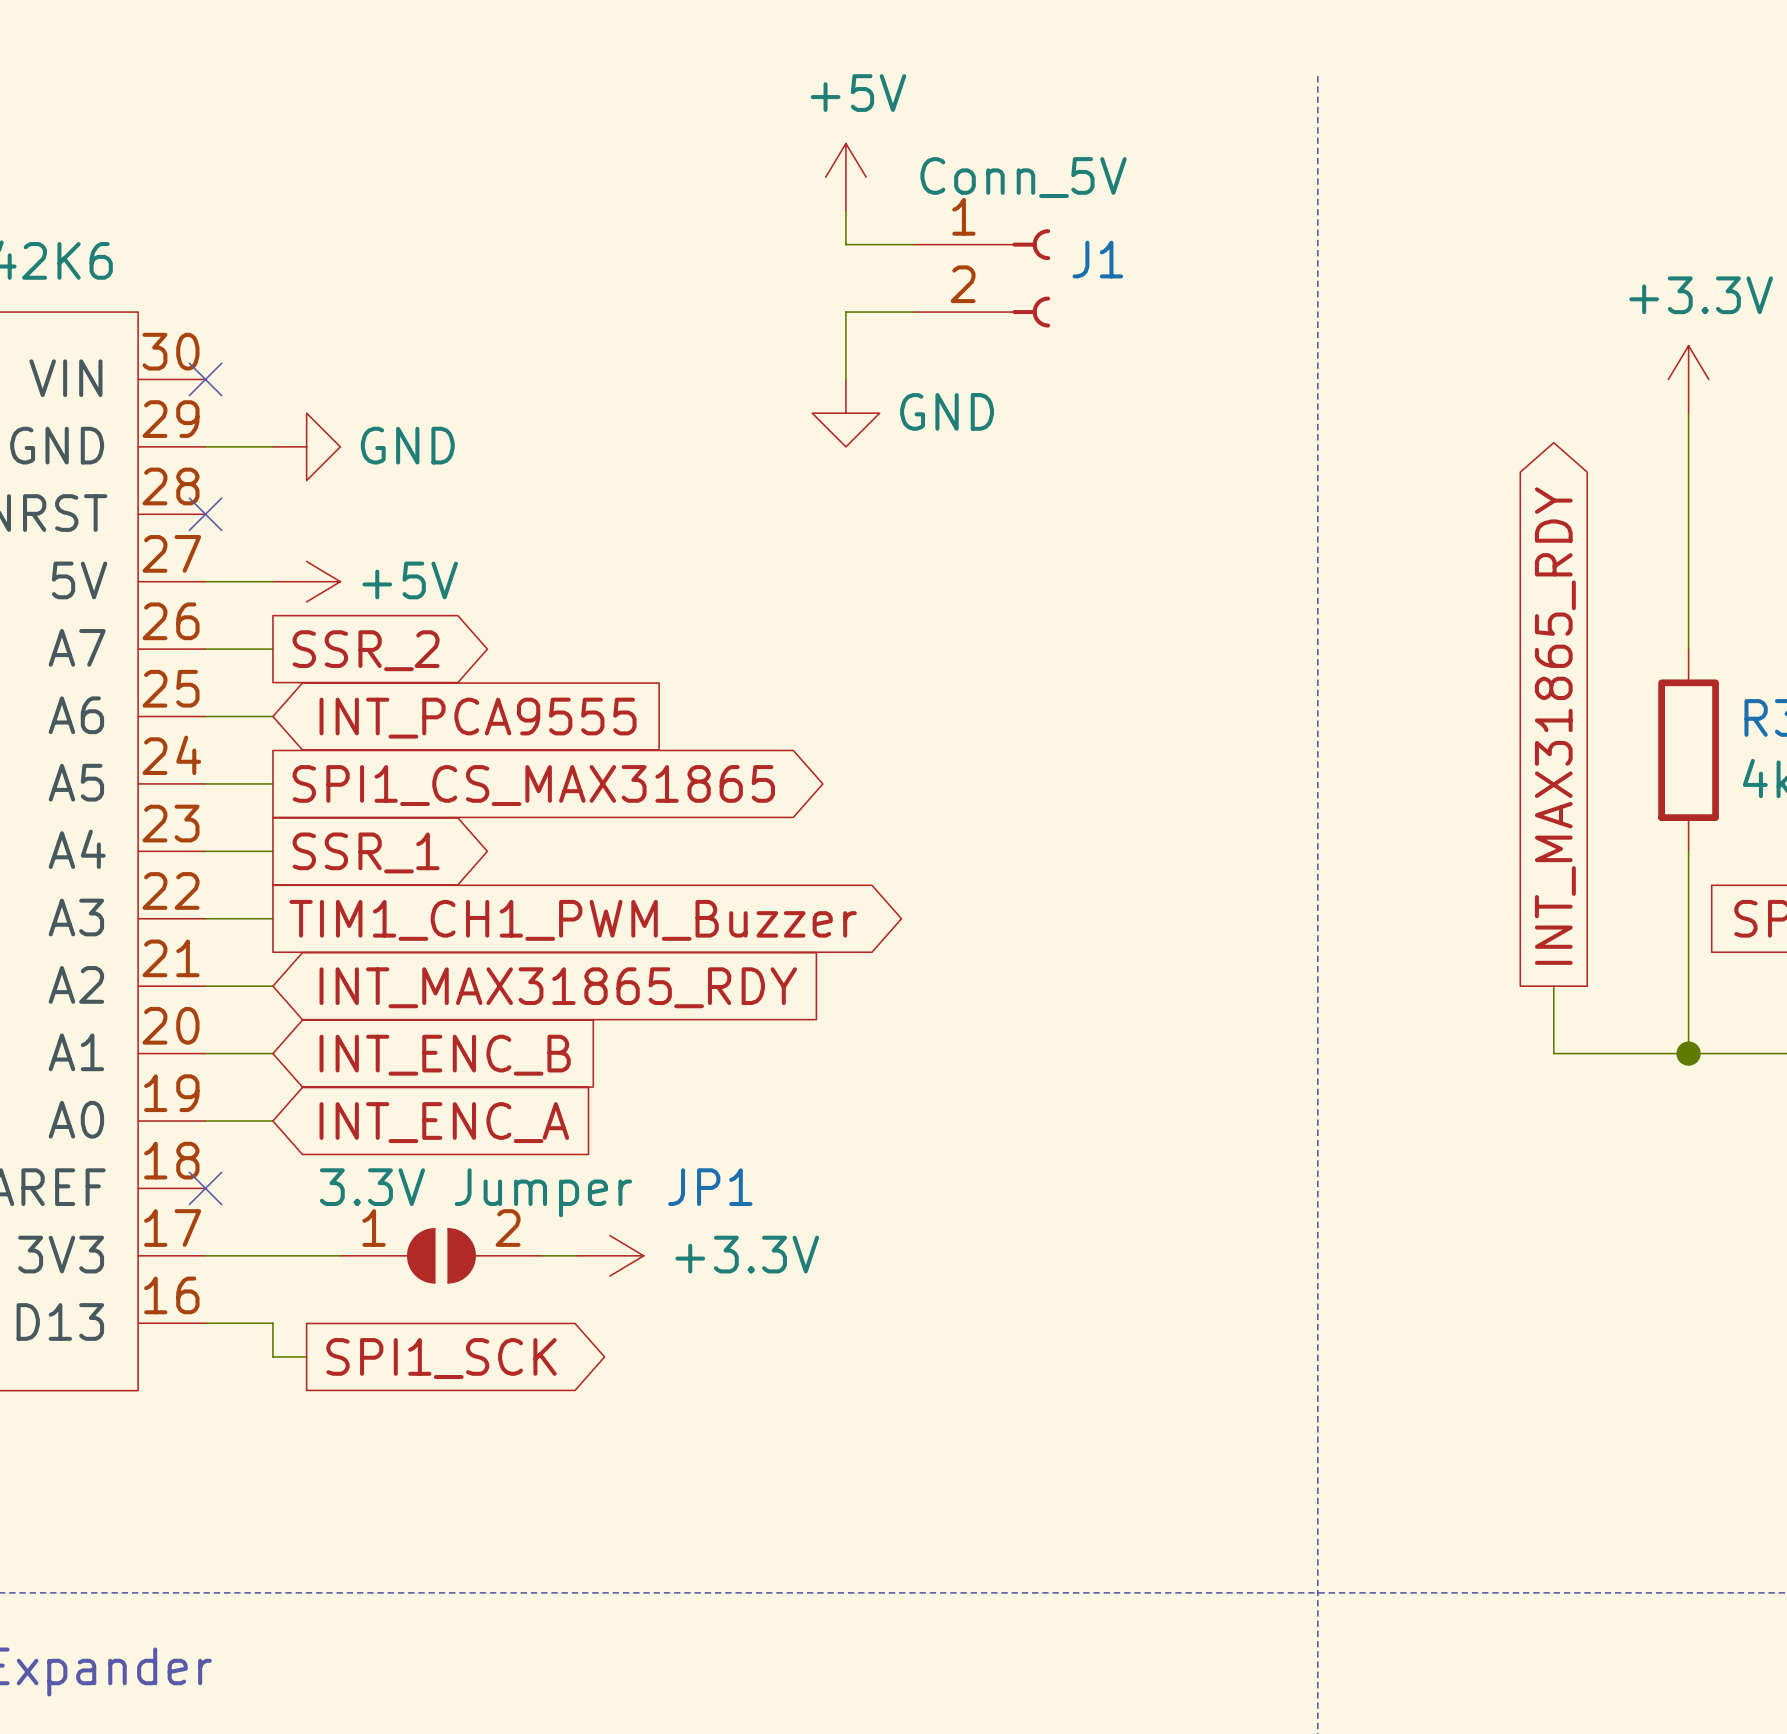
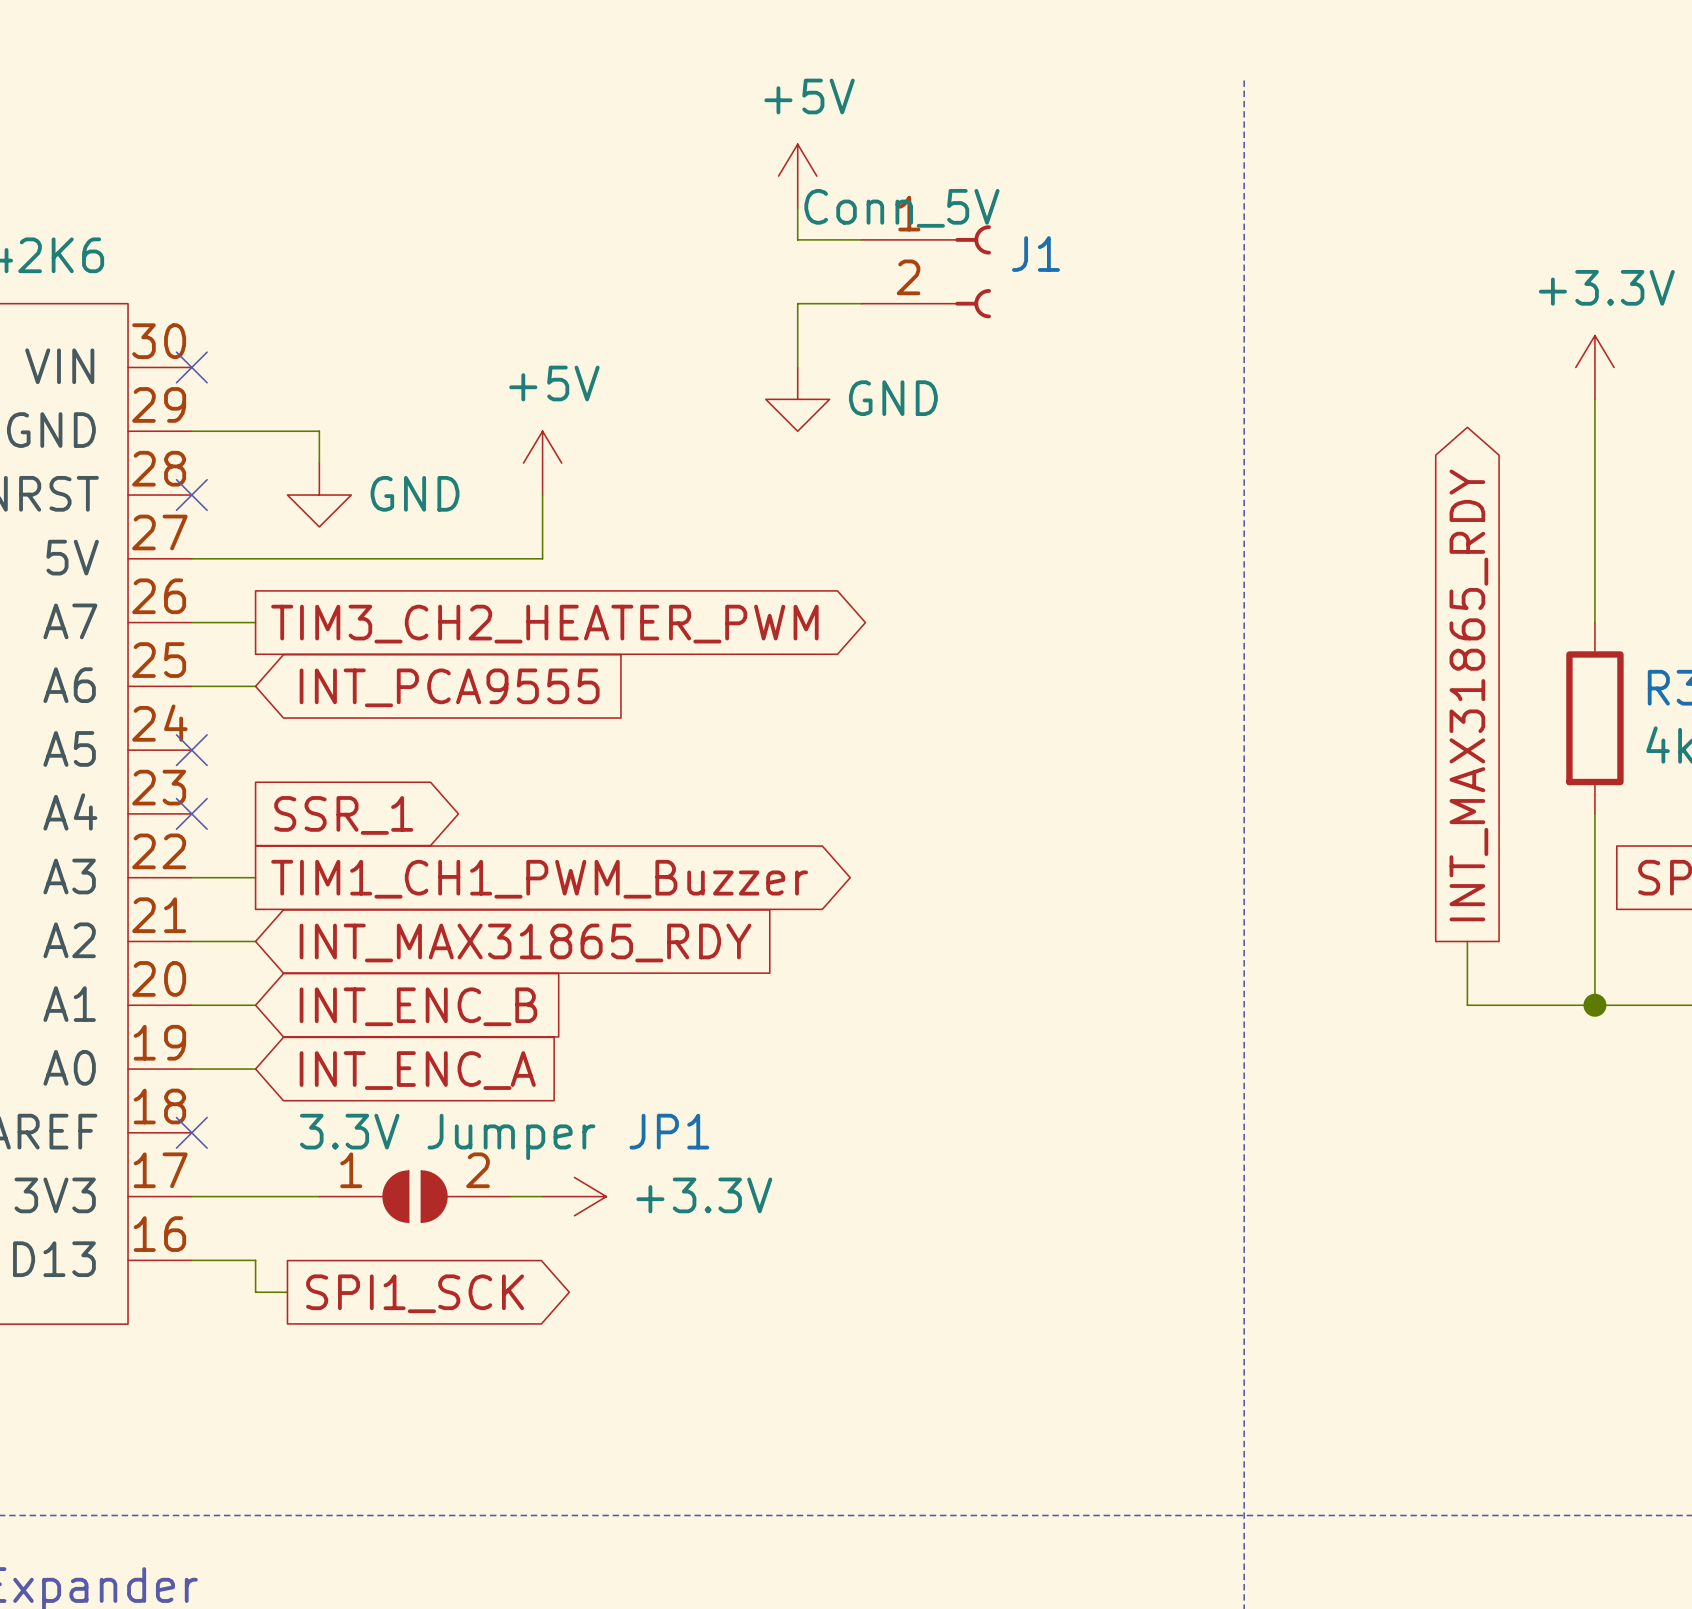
J1 value position: Conn_5V (1023, 177) -> Conn_5V (901, 208)
wire: none -> (255, 431) (319, 431) (319, 463)
power symbol rotation: 0° (306, 446) -> 90° clockwise (319, 495)
power symbol position: GND (306, 446) -> GND (319, 495)
wire: none -> (542, 495) (542, 558) (255, 558)
power symbol rotation: 0° (306, 581) -> 90° counterclockwise (542, 463)
power symbol position: +5V (306, 581) -> +5V (542, 463)
global label: SSR_2 (366, 650) -> TIM3_CH2_HEATER_PWM (544, 624)
wire: (205, 783) (272, 783) -> none
no-connect mark: none -> (191, 750)
global label: SPI1_CS_MAX31865 (533, 785) -> none
wire: (205, 851) (272, 851) -> none
no-connect mark: none -> (191, 813)

